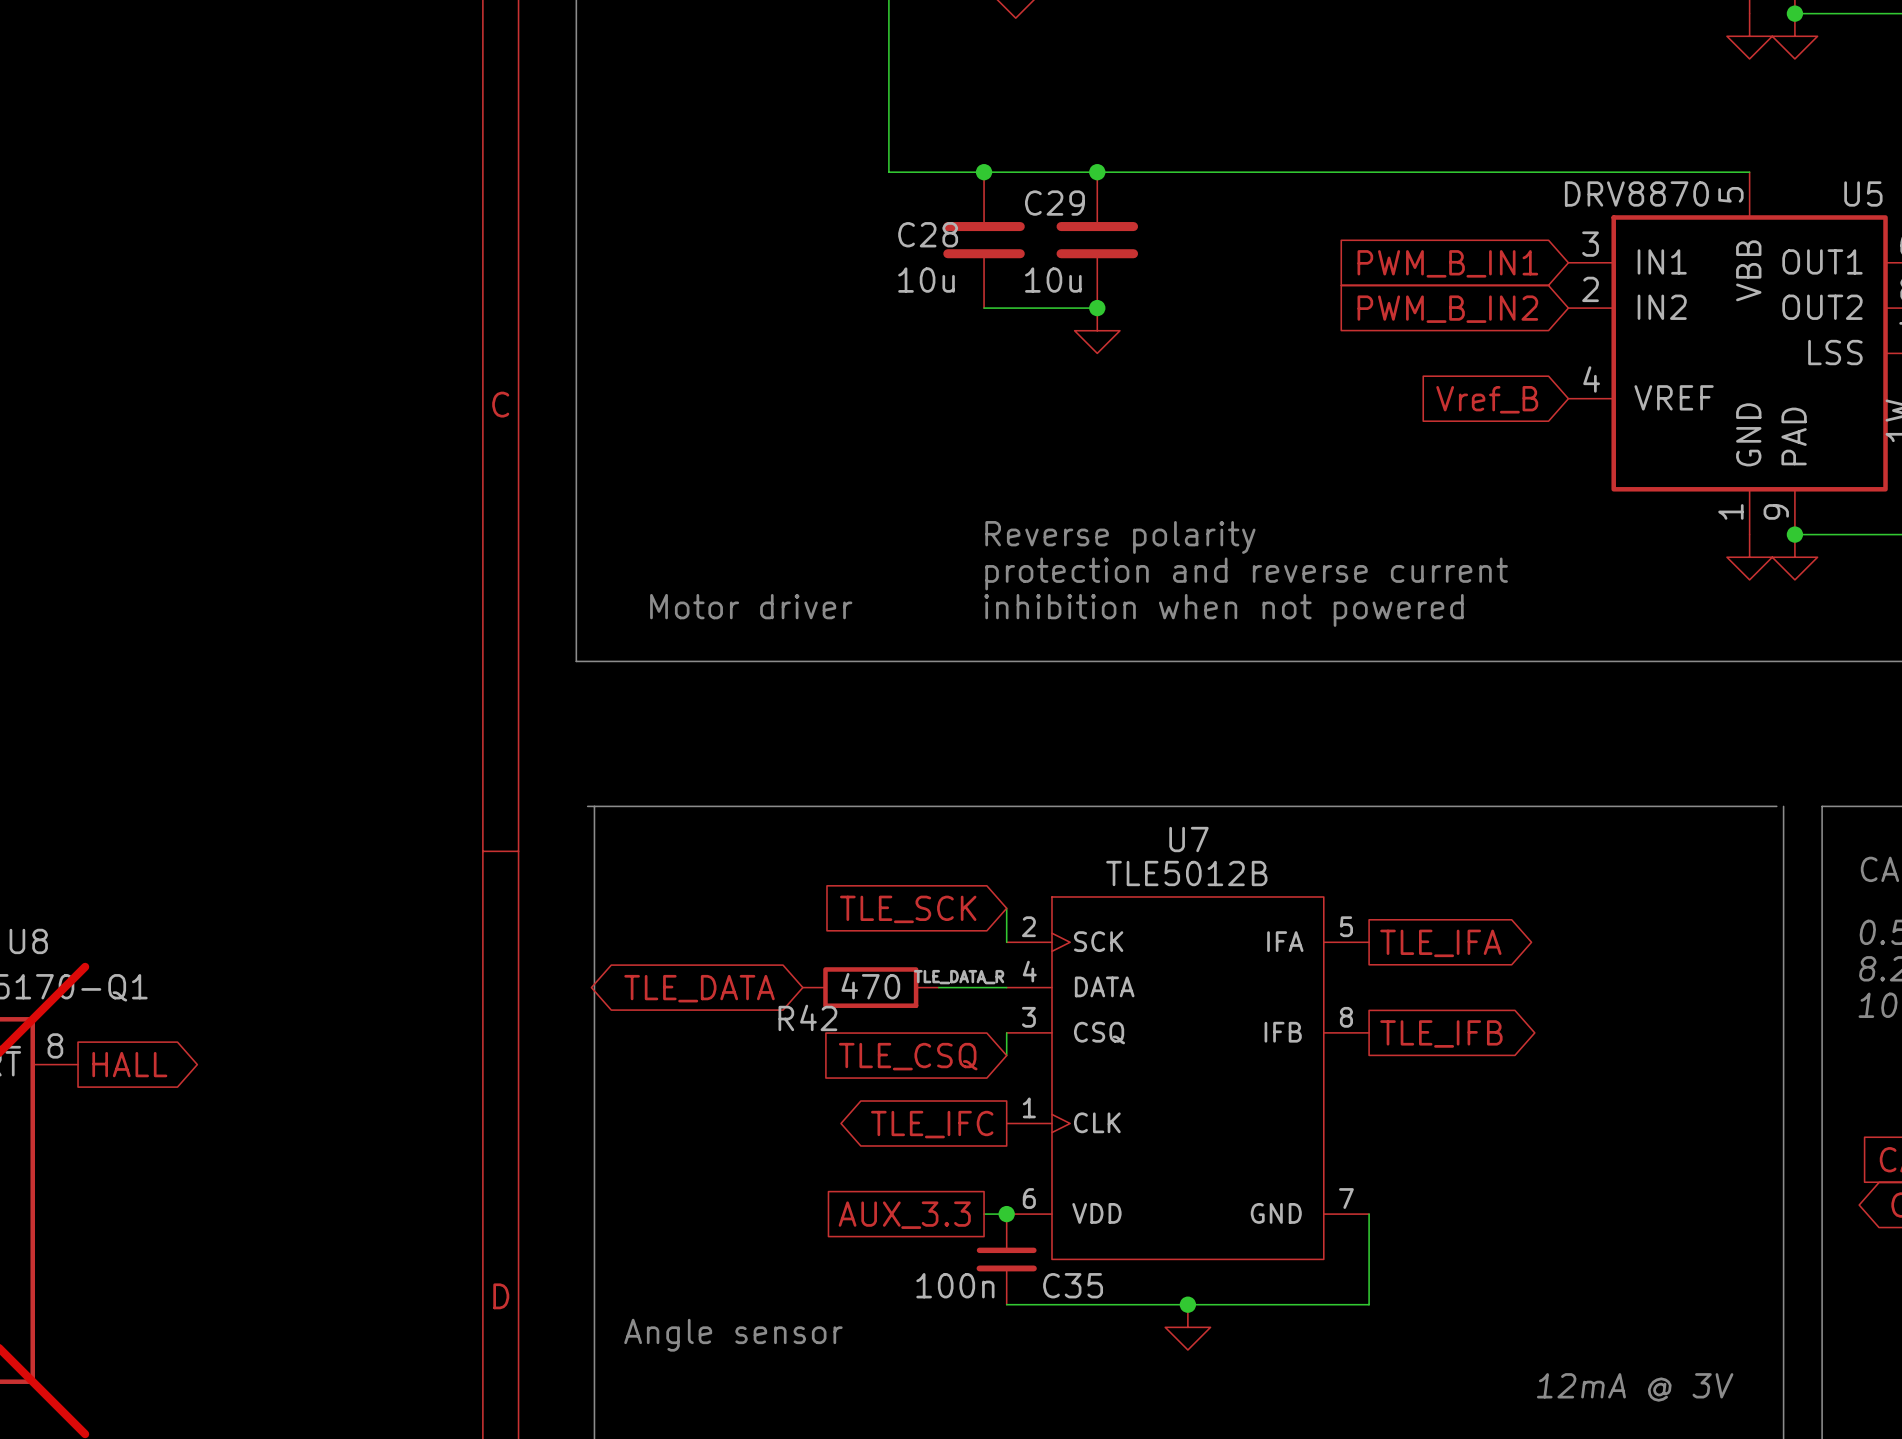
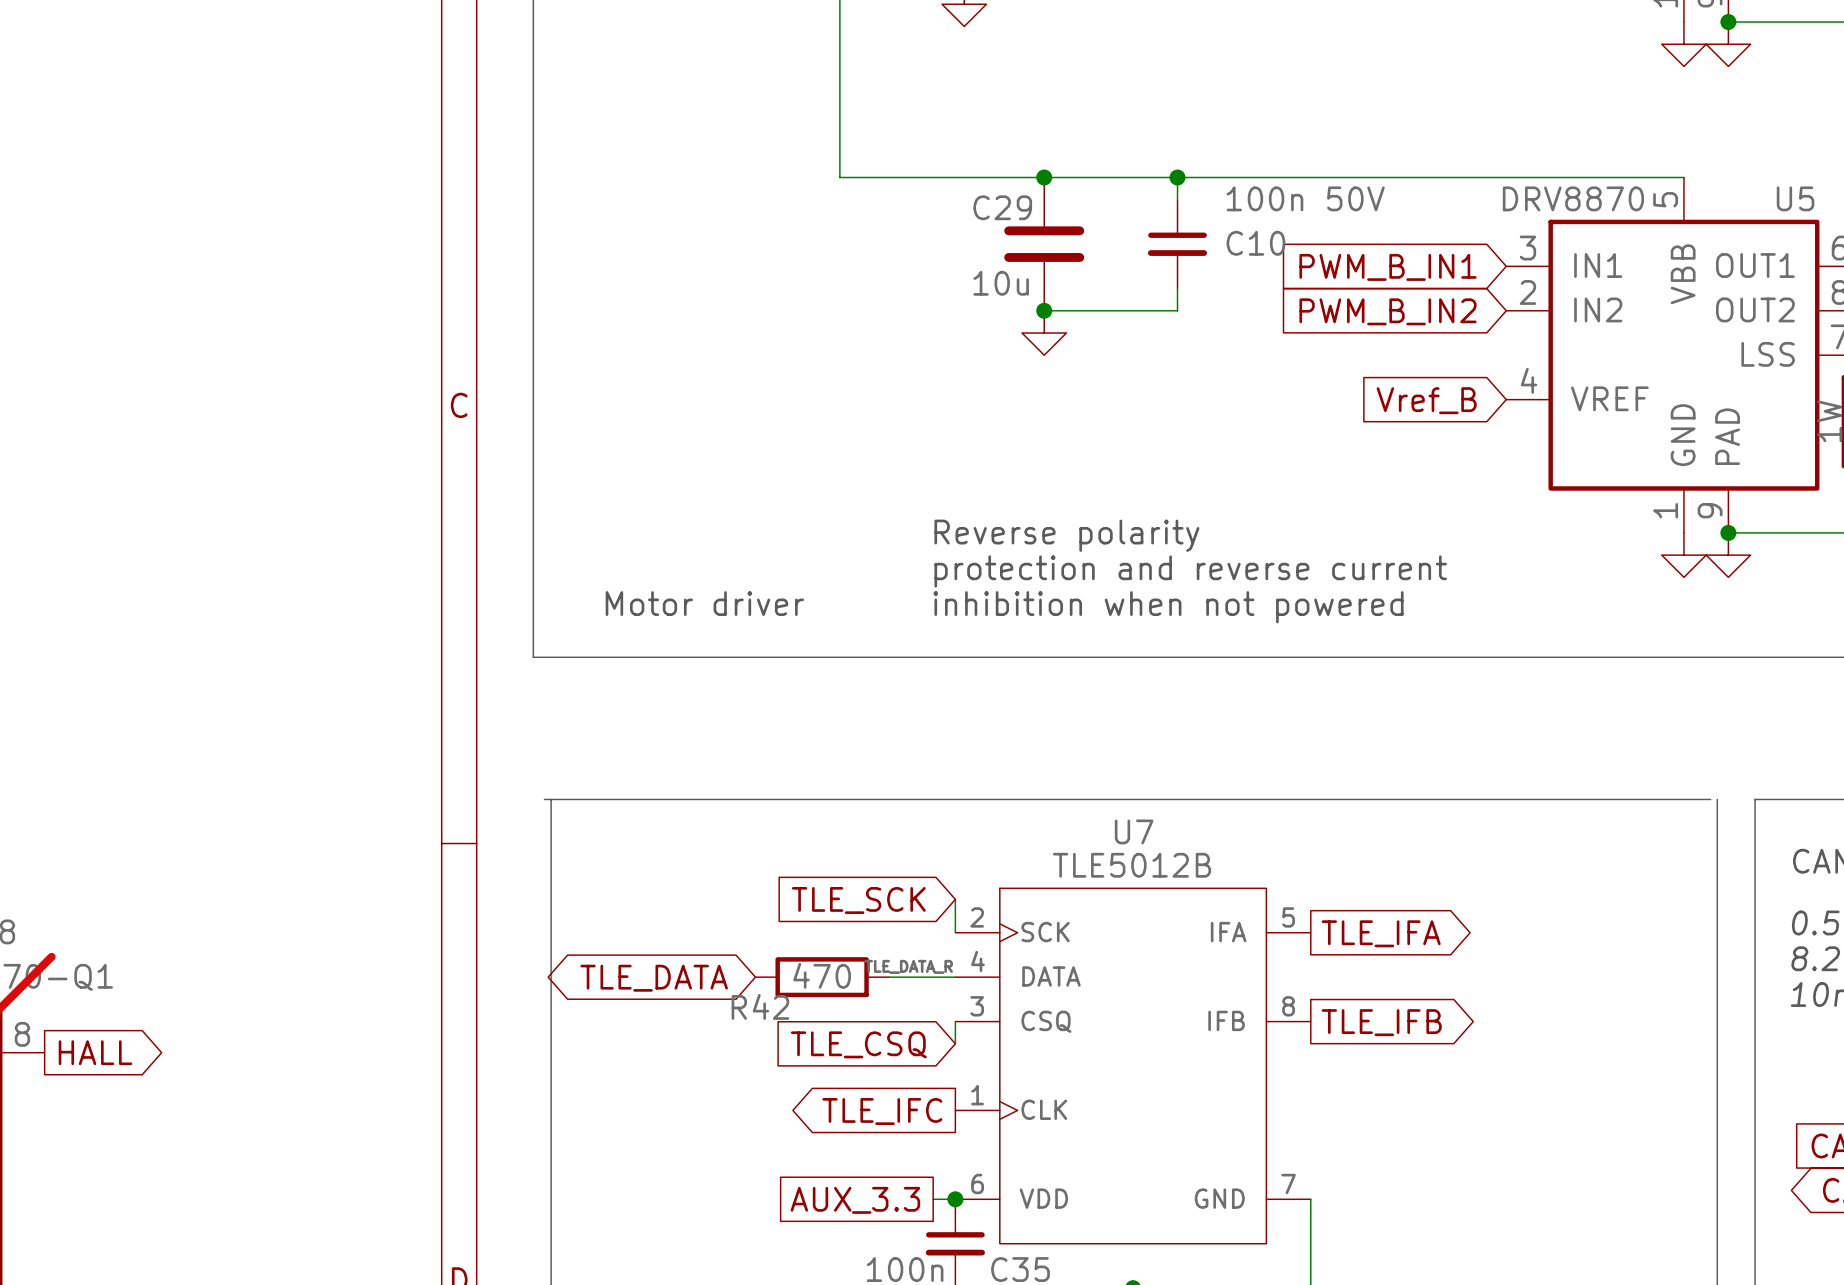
junction: (984, 172) -> none
wire: none -> (1177, 177) (1177, 199)
junction: none -> (1177, 177)
C28: 10u (984, 240) -> none
C10: none -> 100n 50V (1177, 244)
wire: (984, 308) (1097, 308) -> (1177, 288) (1177, 310) (1044, 310)

